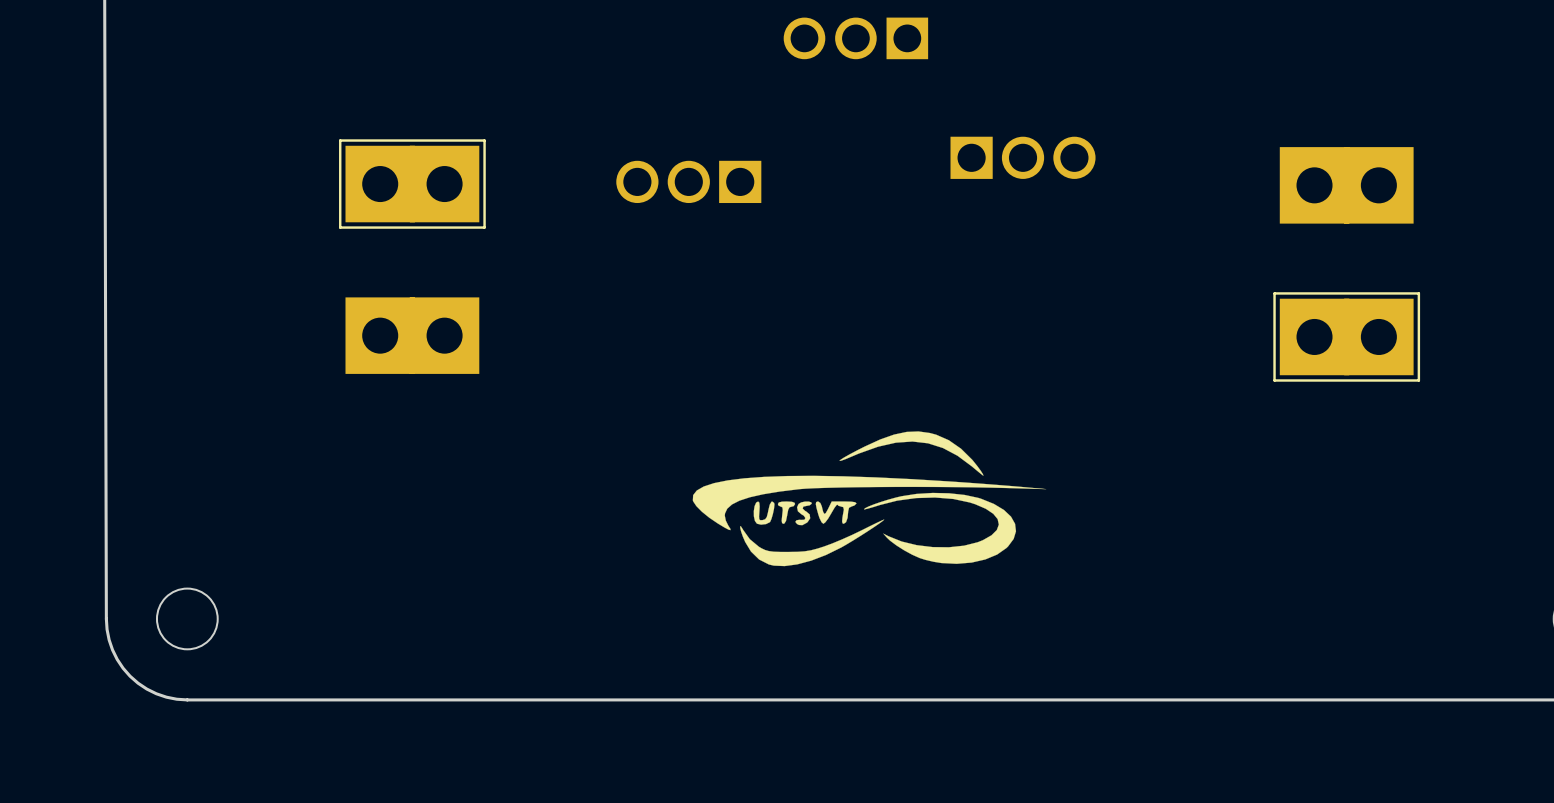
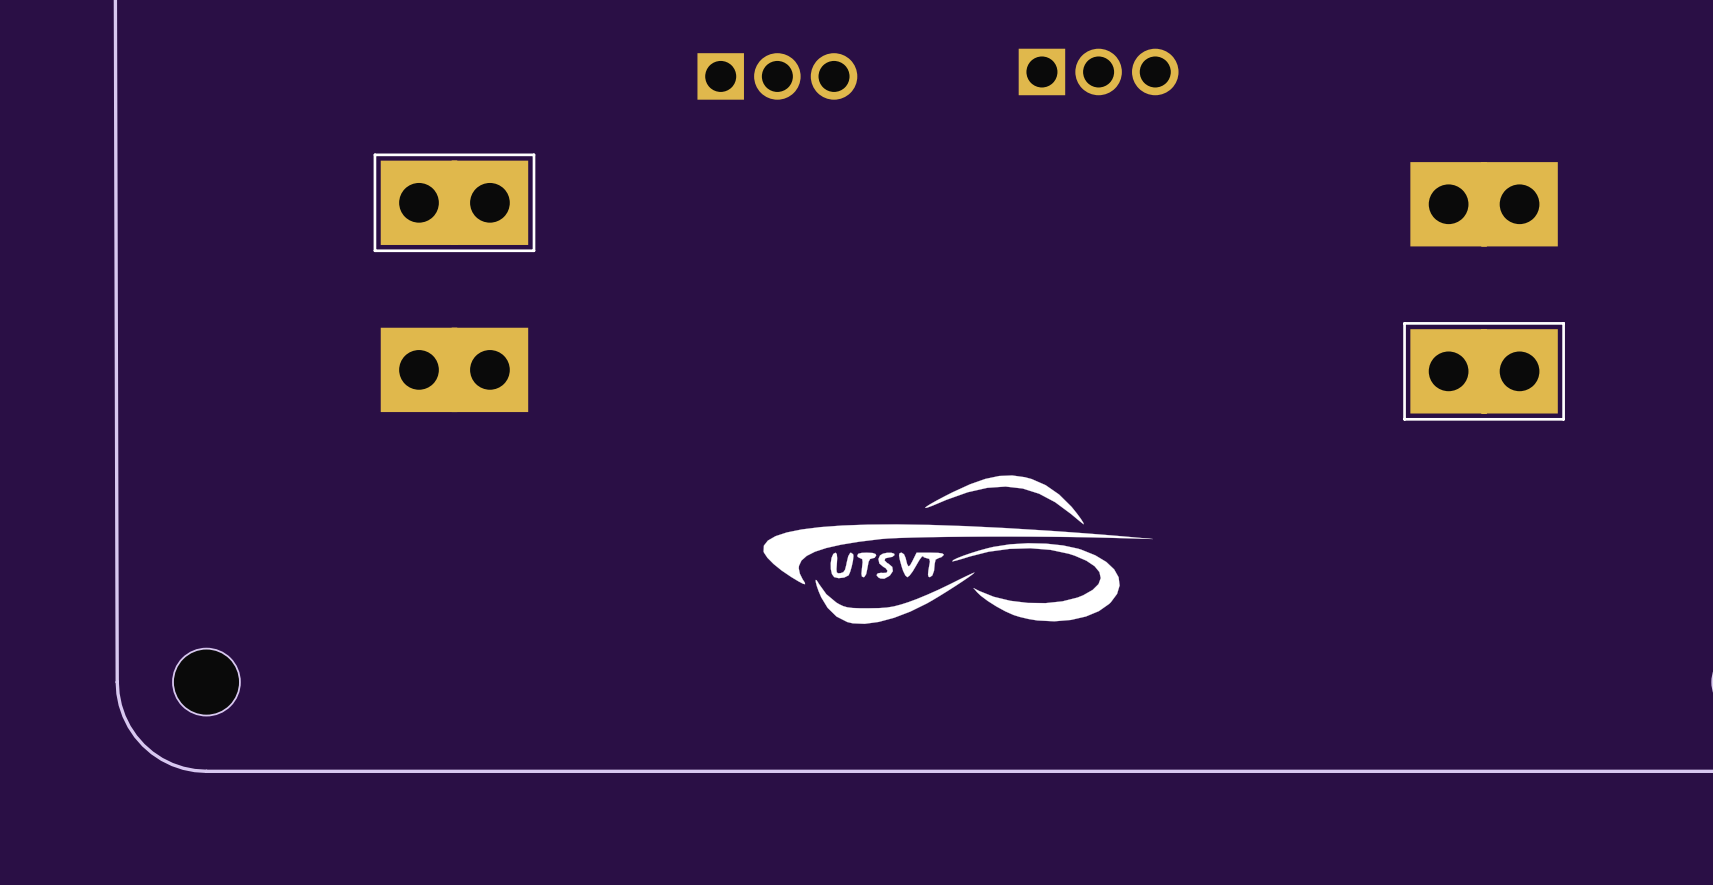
part: (855, 38) -> none
part position: (1023, 157) -> (1098, 71)
part rotation: 0° (688, 181) -> 180° (777, 76)
part position: (688, 181) -> (777, 76)

